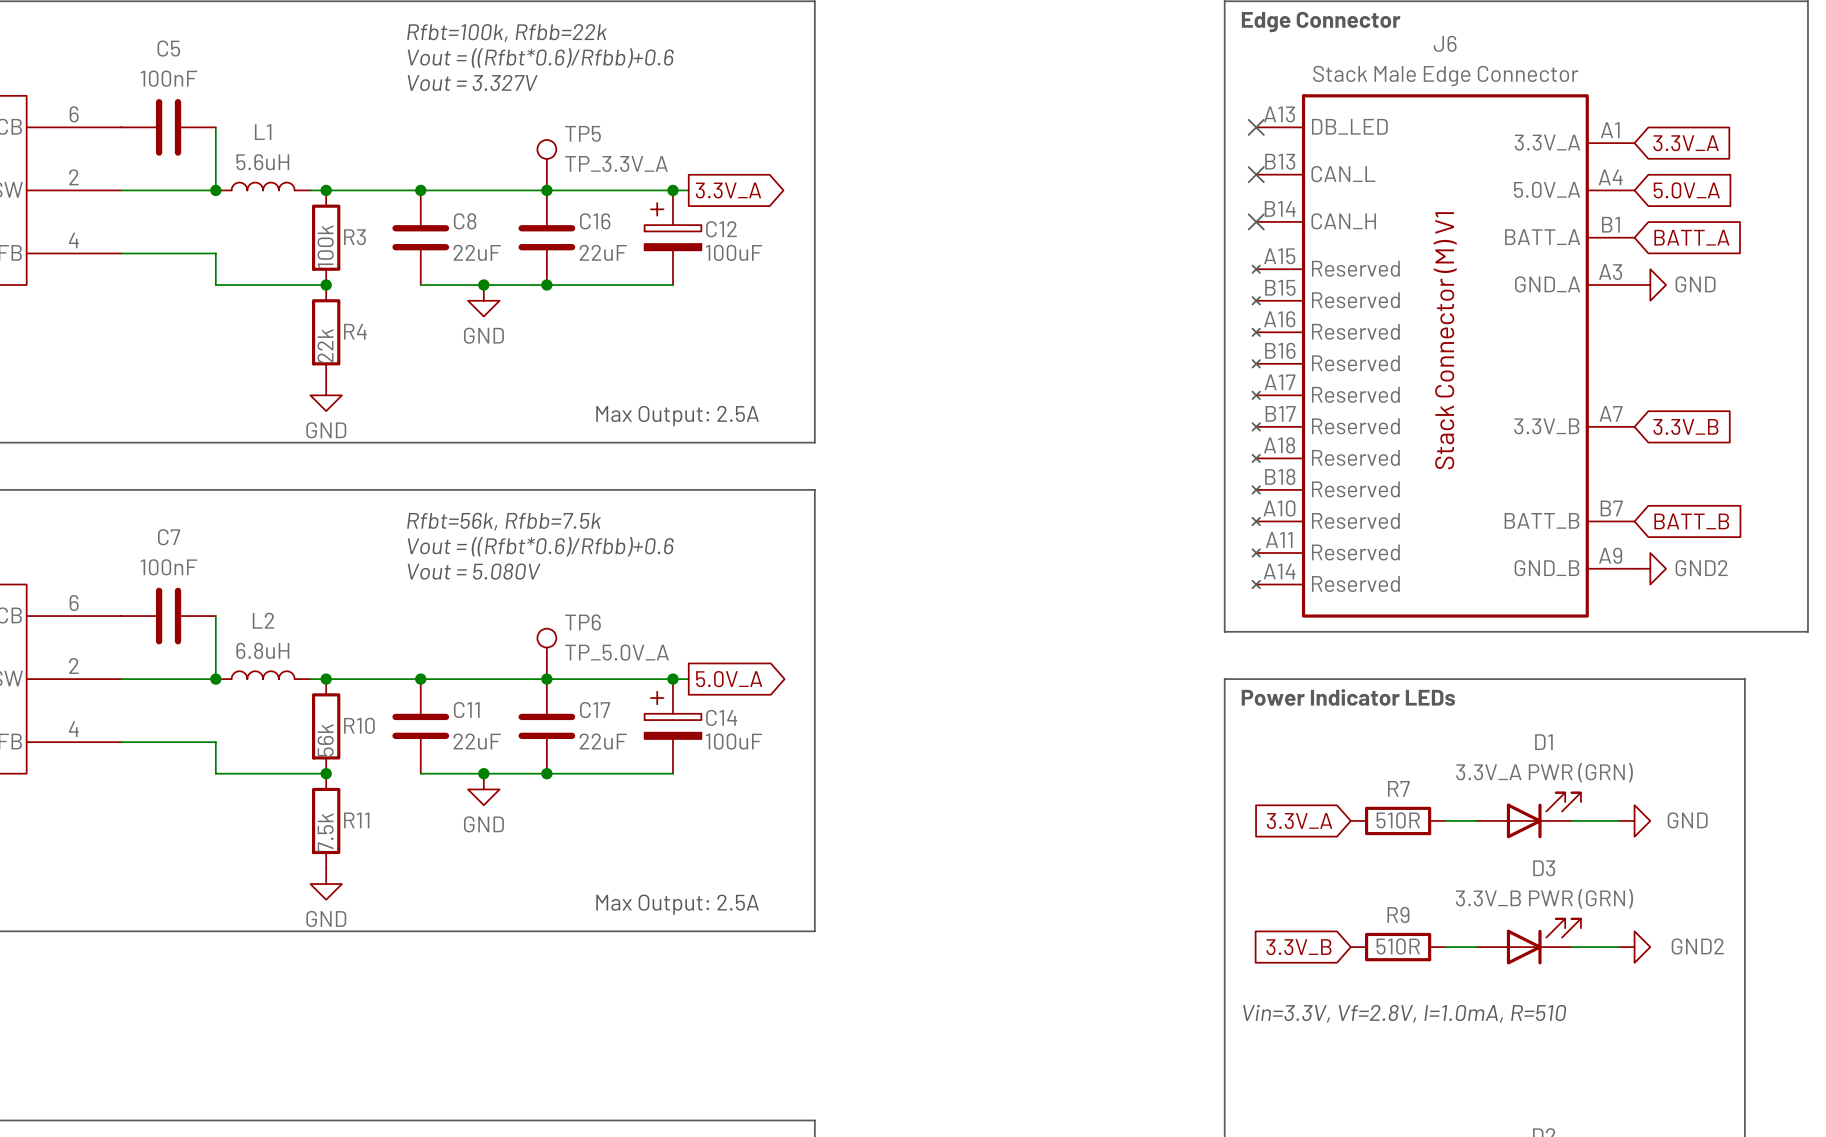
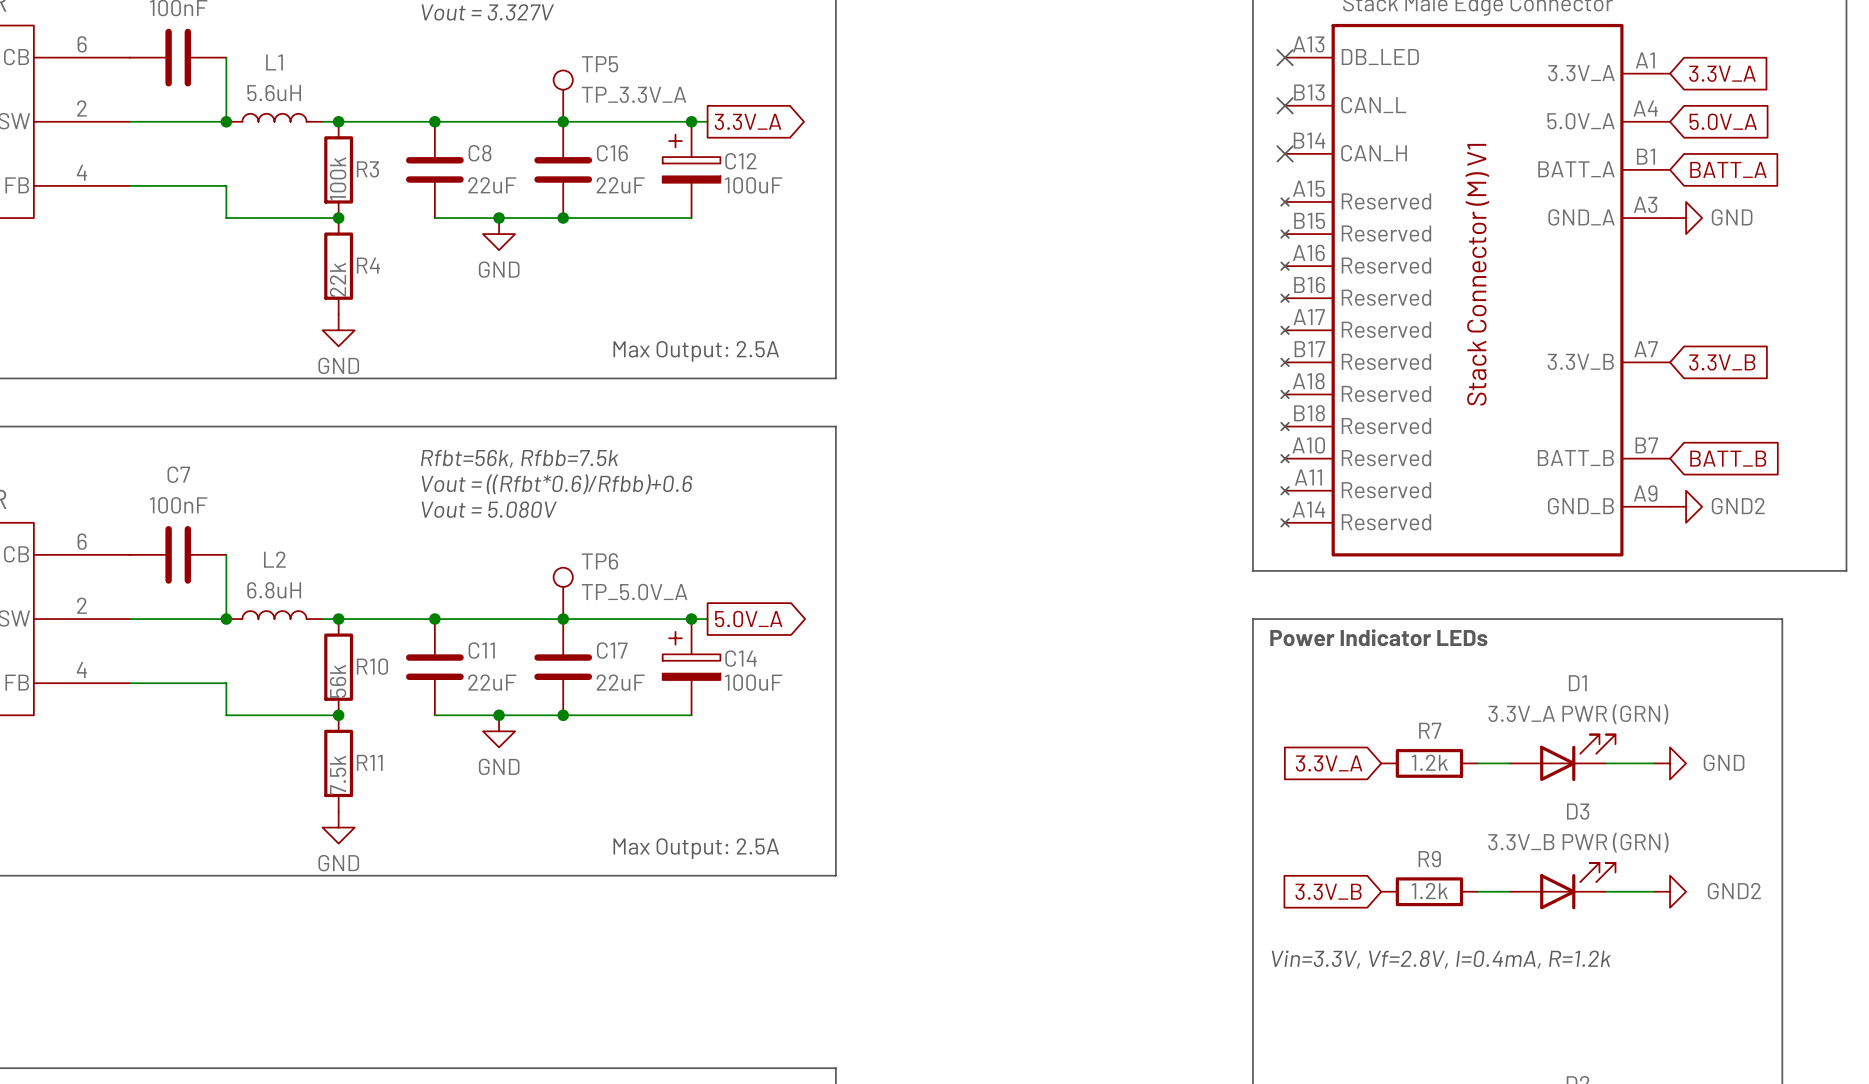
R7 value: 510R (1398, 820) -> 1.2k (1429, 762)
R9 value: 510R (1398, 946) -> 1.2k (1429, 891)
text: Vin=3.3V, Vf=2.8V, I=1.0mA, R=510 (1404, 1013) -> Vin=3.3V, Vf=2.8V, I=0.4mA, R=1.2k (1441, 959)

